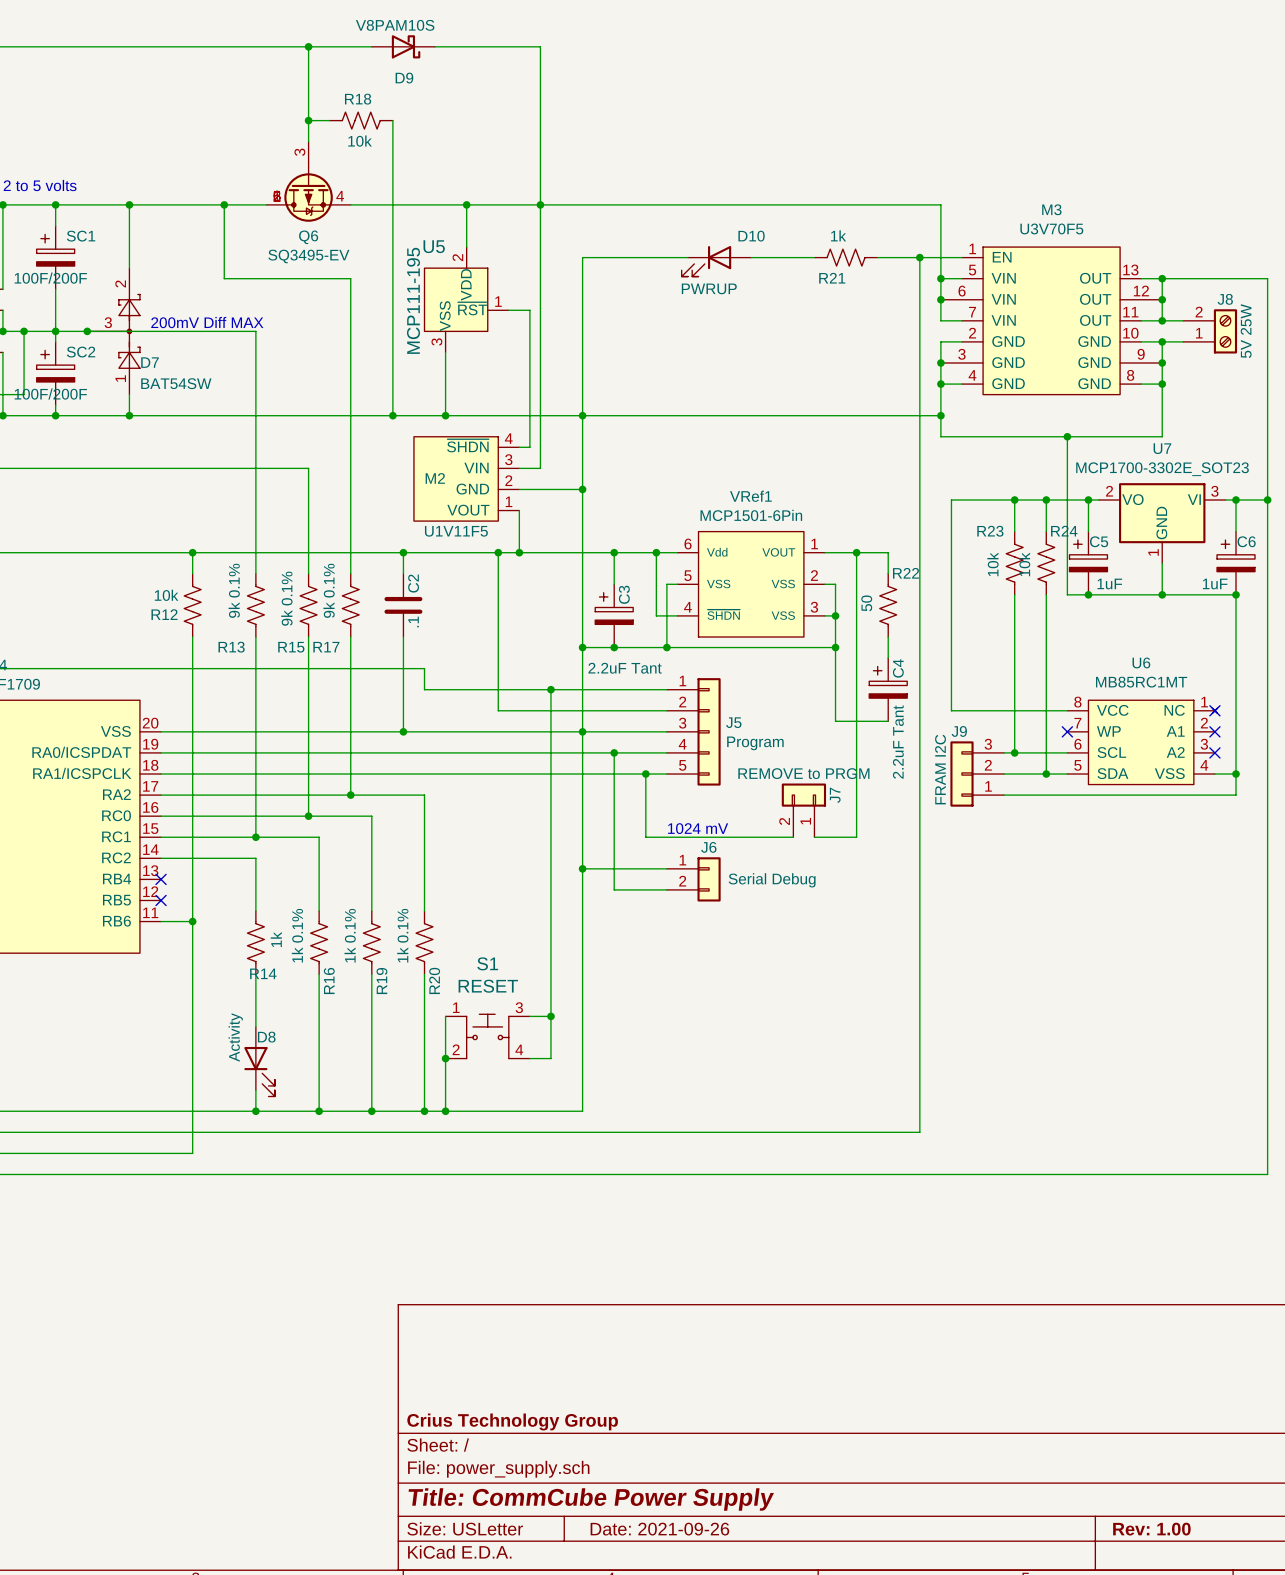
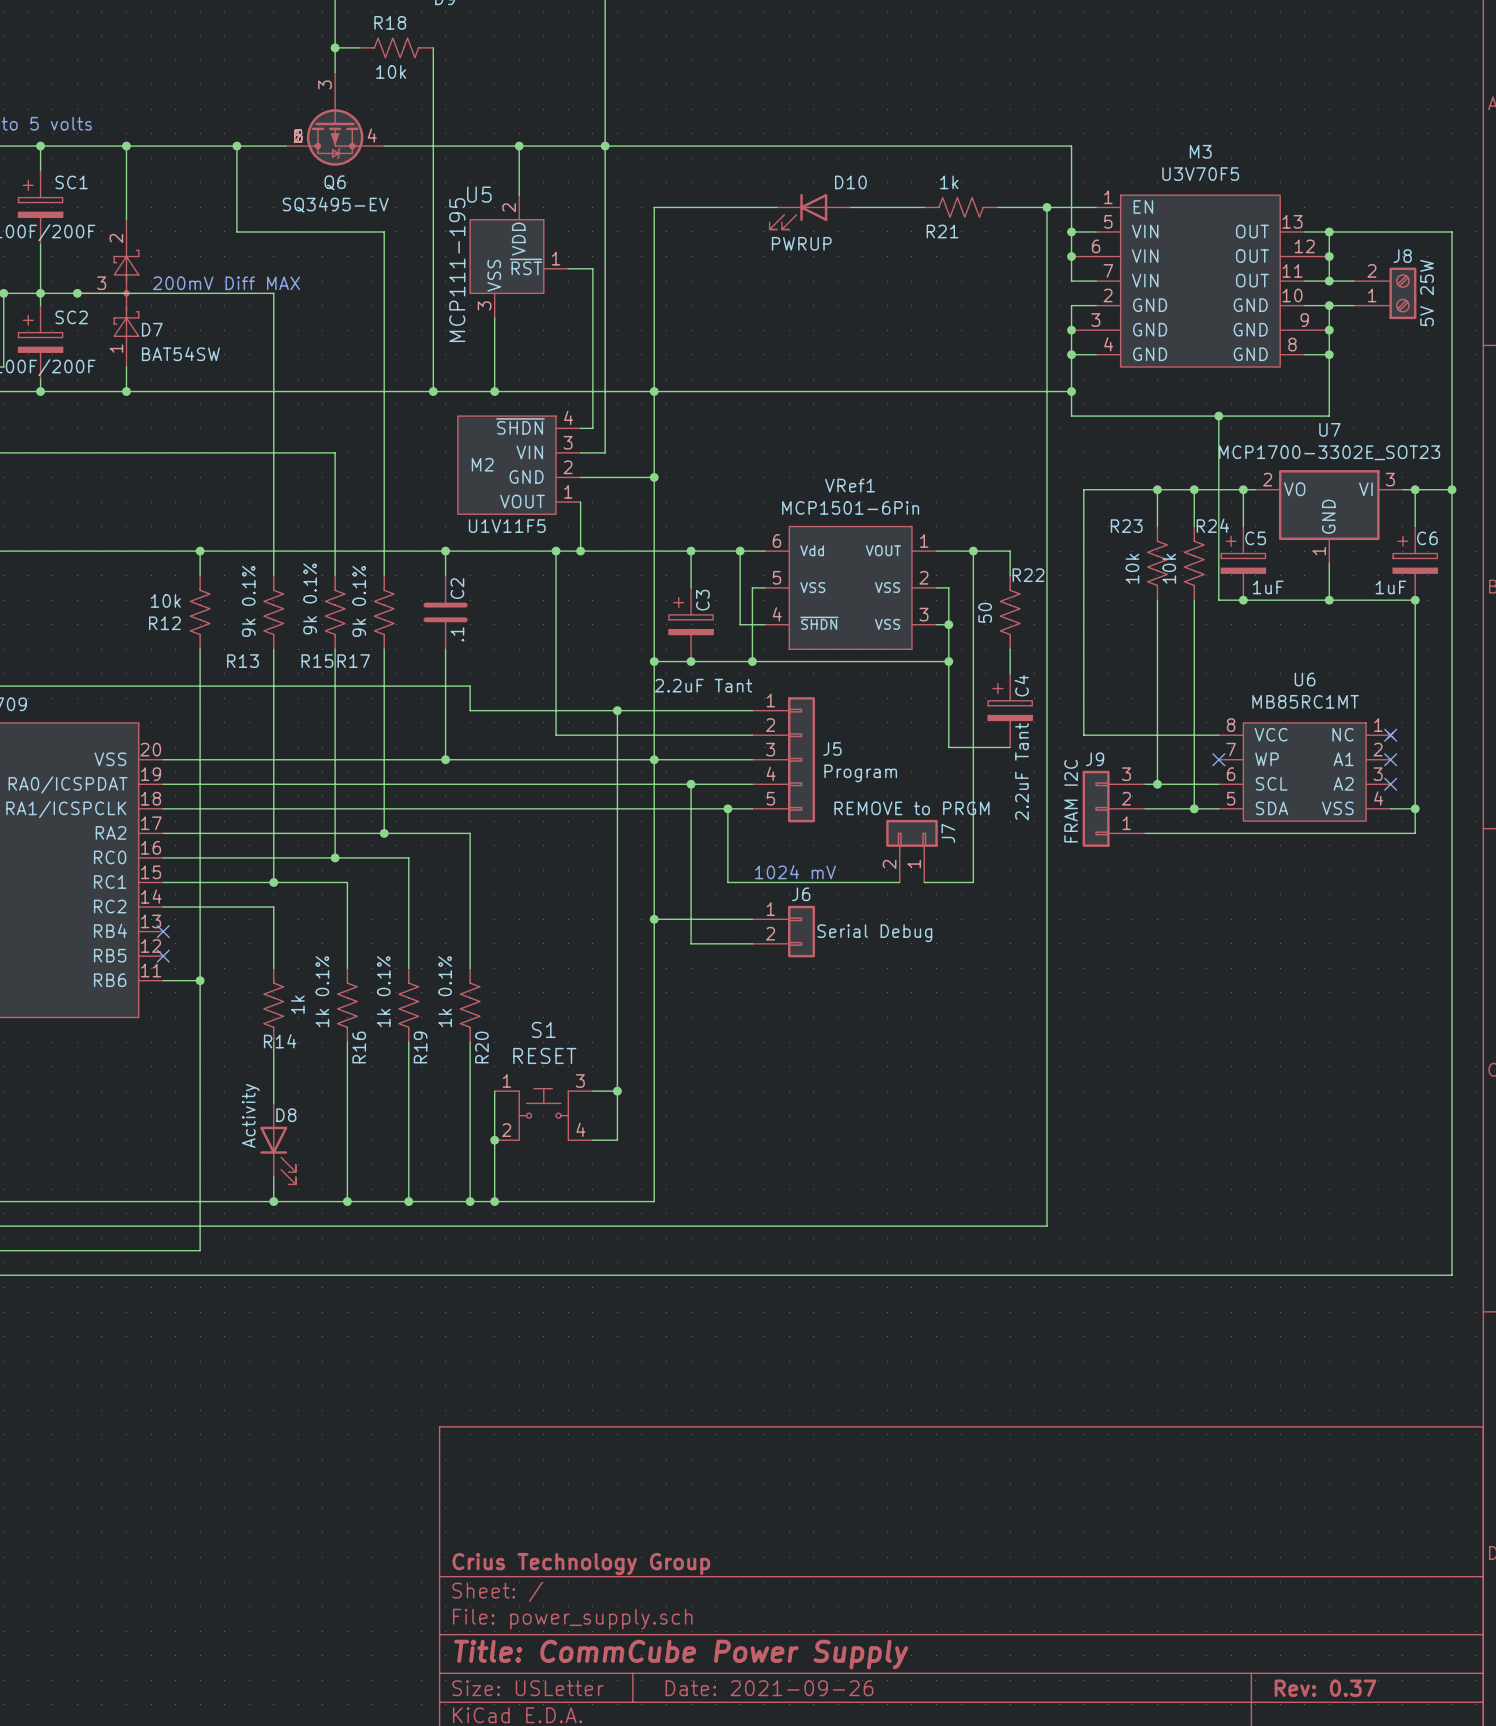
title block: Rev: 1.00 (1151, 1529) -> Rev: 0.37 (1325, 1688)

